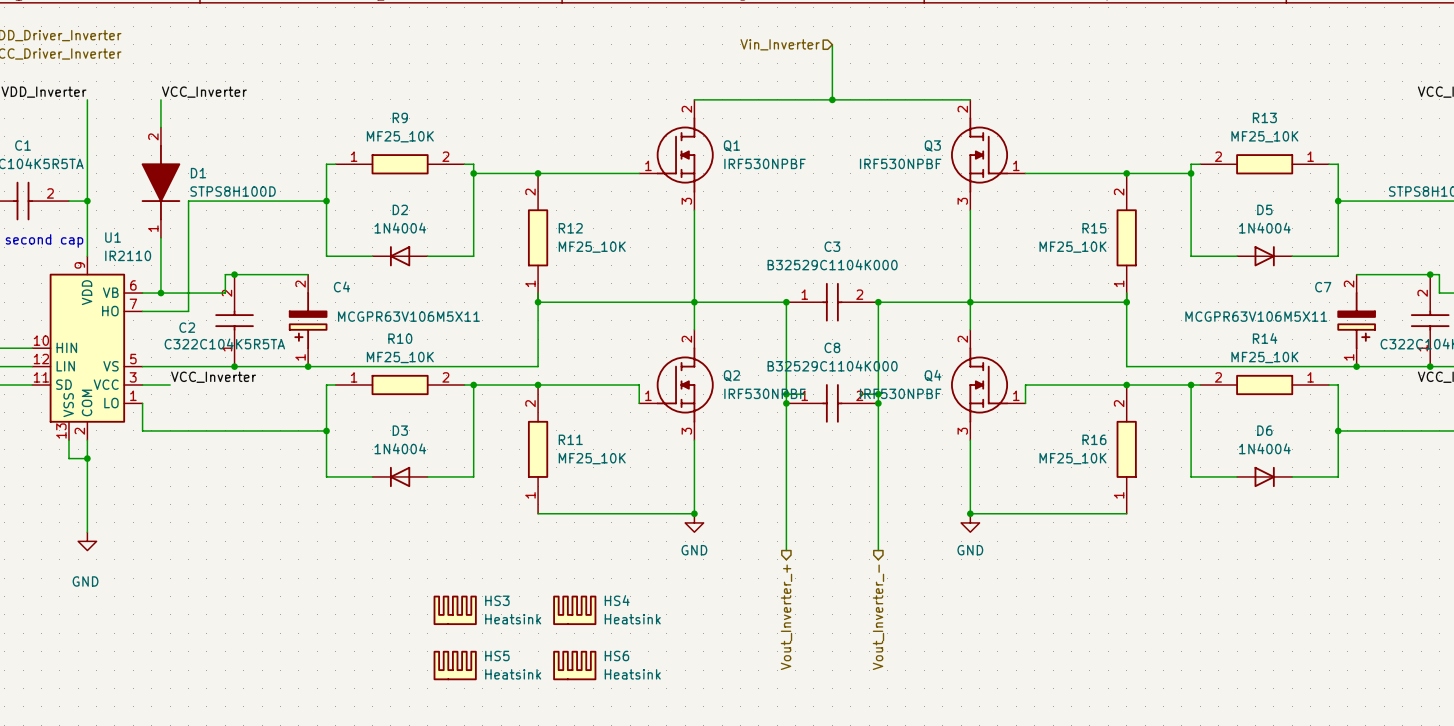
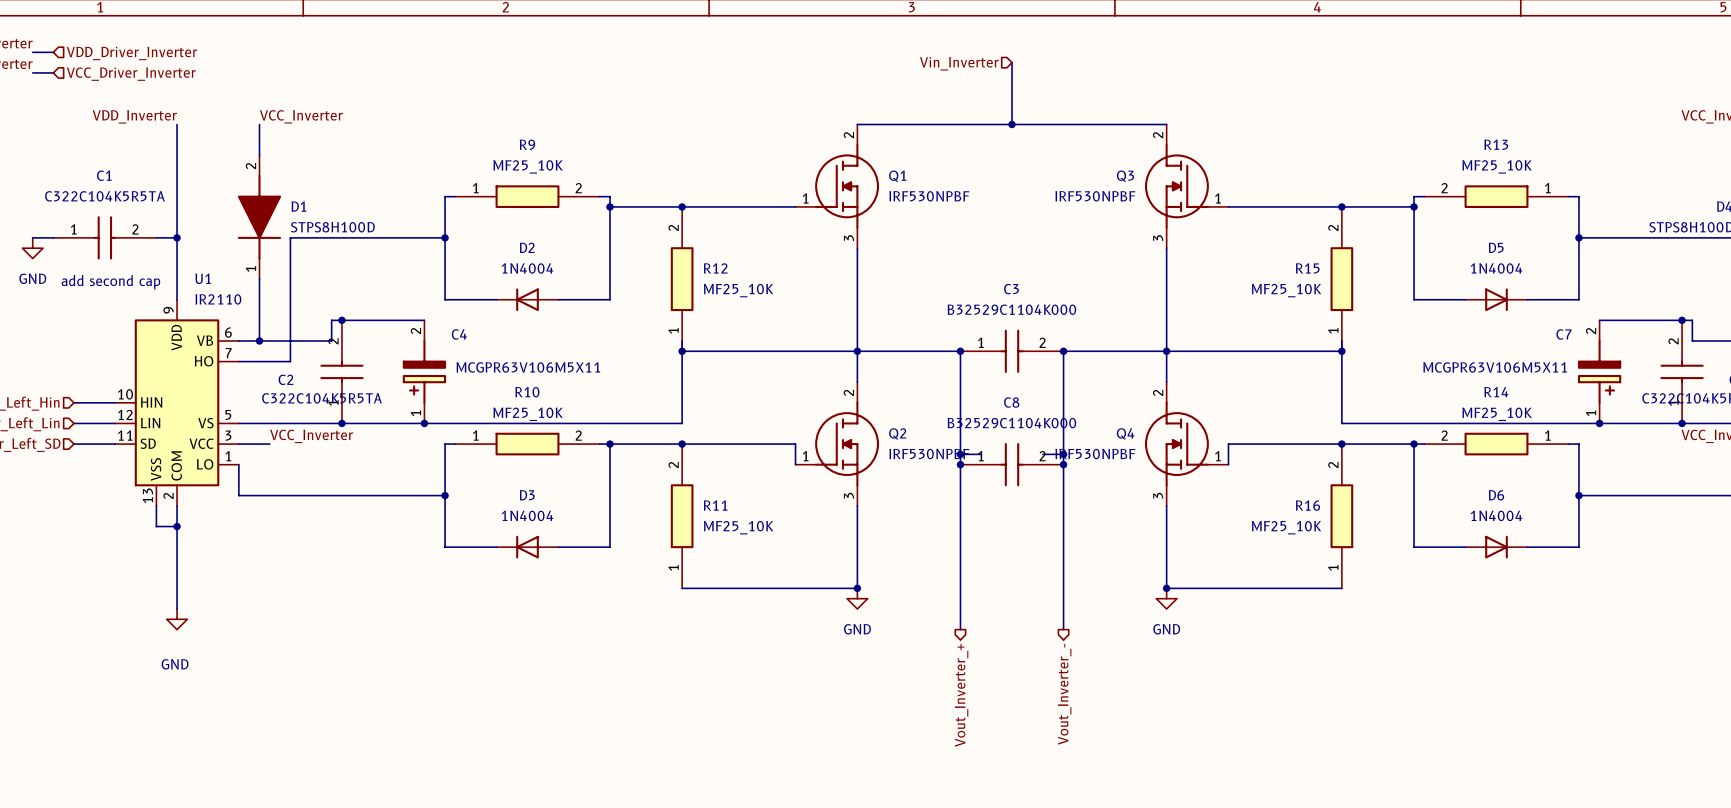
HS3: Heatsink (455, 610) -> none
HS4: Heatsink (574, 610) -> none
HS5: Heatsink (455, 665) -> none
HS6: Heatsink (574, 665) -> none

